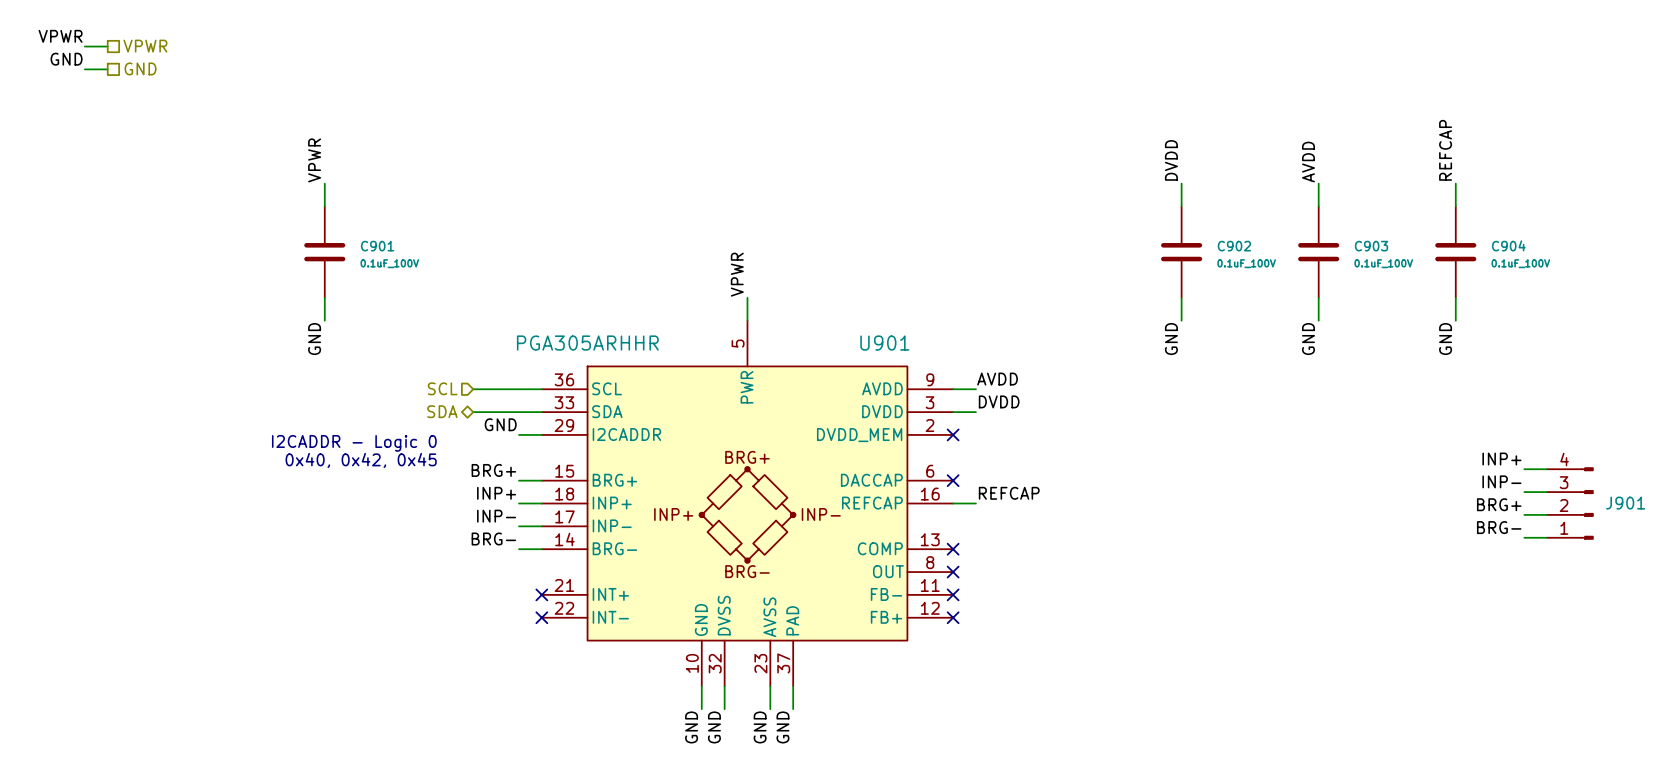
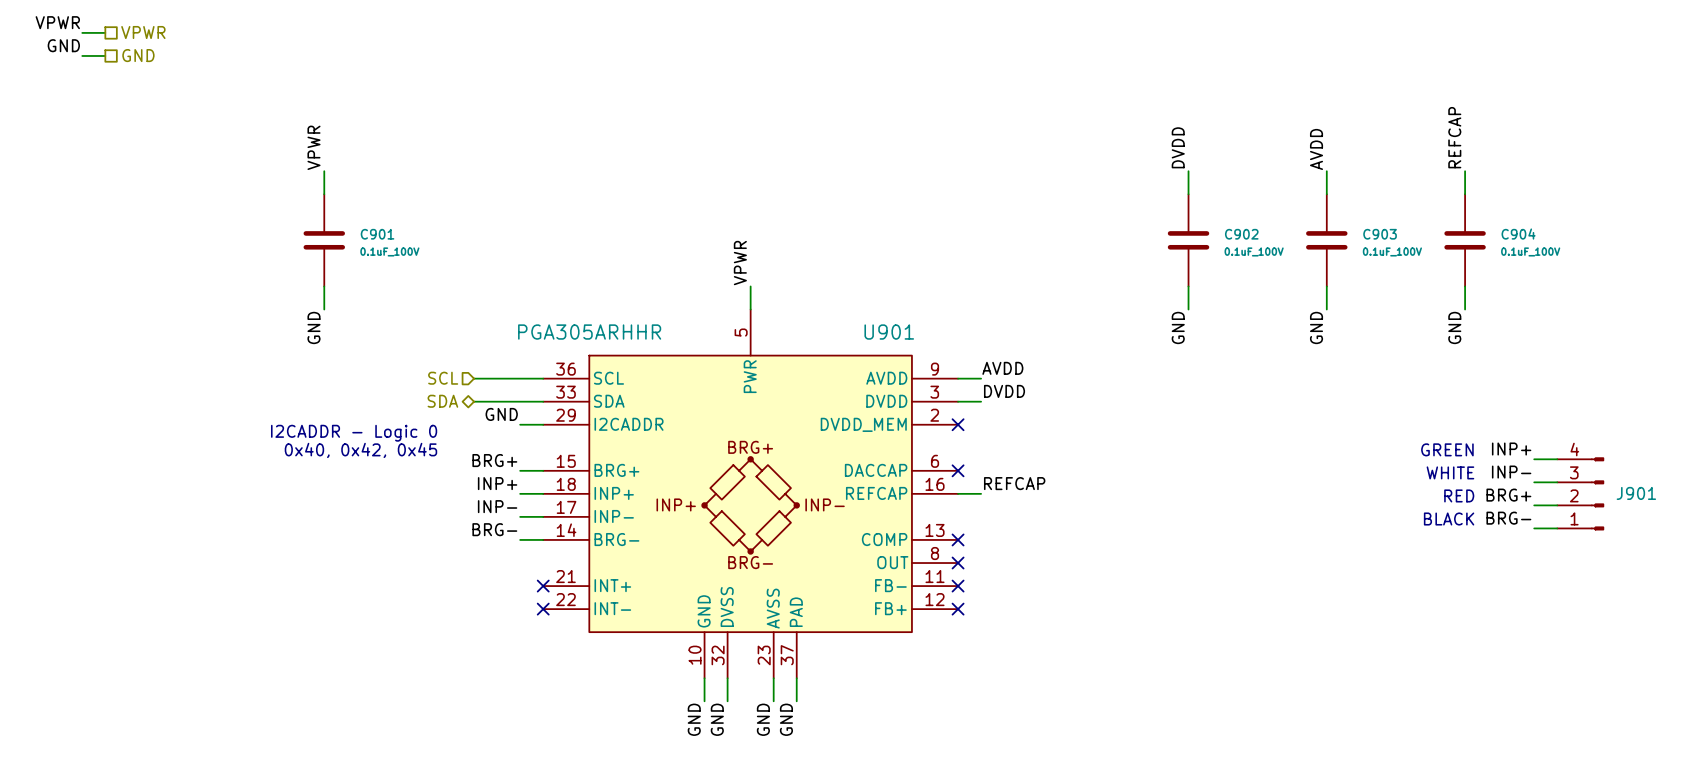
text: none -> GREEN (1447, 449)
text: none -> WHITE (1450, 472)
text: none -> RED (1459, 495)
text: none -> BLACK (1449, 519)

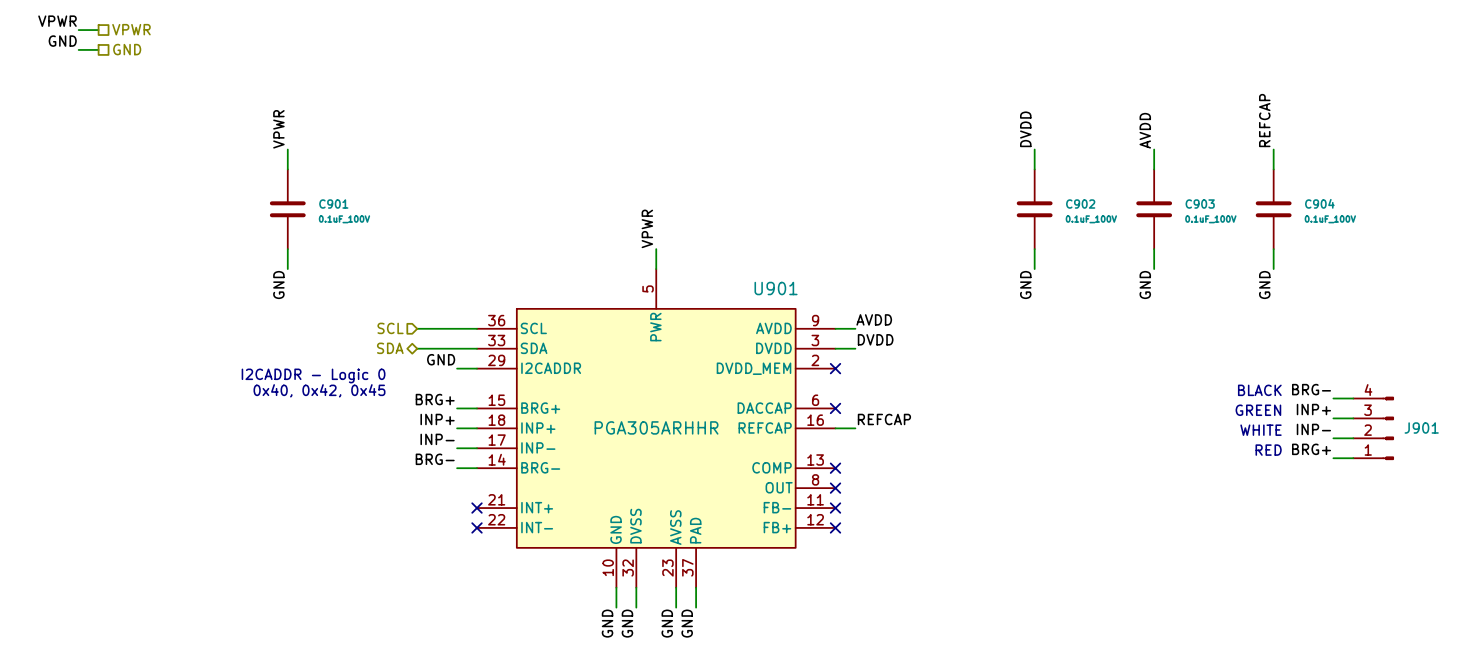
U901 symbol: [543, 309, 959, 679] -> [477, 269, 836, 588]
U901 value position: PGA305ARHHR (589, 332) -> PGA305ARHHR (656, 427)
text: GREEN (1447, 449) -> BLACK (1259, 390)
label: INP+ (1511, 449) -> BRG- (1311, 389)
text: WHITE (1450, 472) -> GREEN (1258, 410)
label: INP- (1511, 472) -> INP+ (1313, 409)
text: RED (1459, 495) -> WHITE (1261, 430)
label: BRG+ (1508, 495) -> INP- (1313, 429)
label: BRG- (1508, 518) -> BRG+ (1311, 449)
text: BLACK (1449, 519) -> RED (1268, 450)

